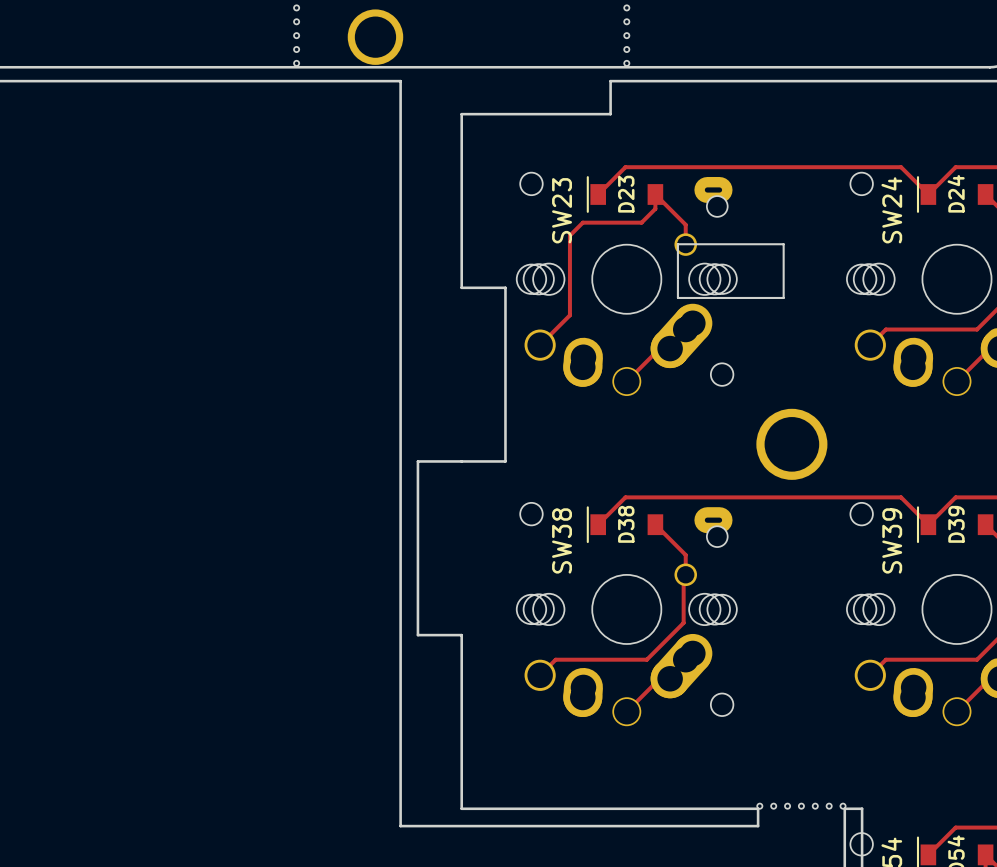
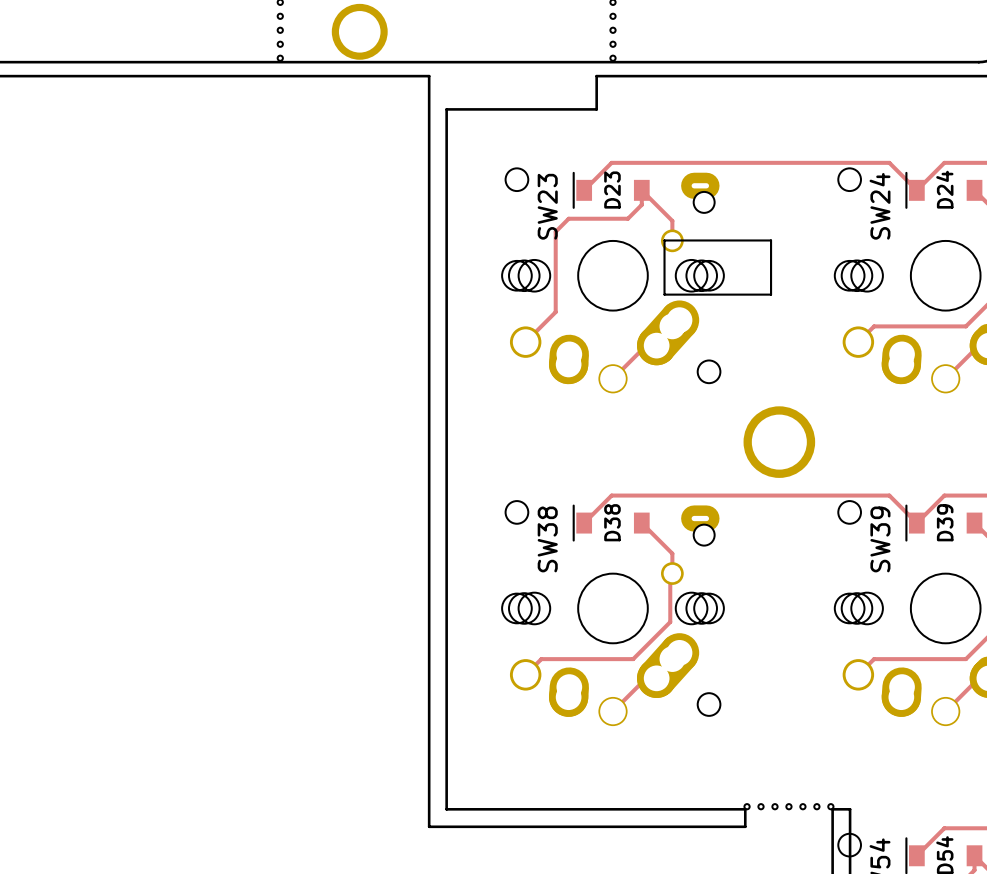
board edge: (400, 81) (400, 826) (444, 826) -> (385, 76) (429, 76) (429, 826)
board edge: (461, 287) (505, 287) (505, 461) (417, 461) (417, 635) (461, 635) -> (446, 284) (446, 634)

